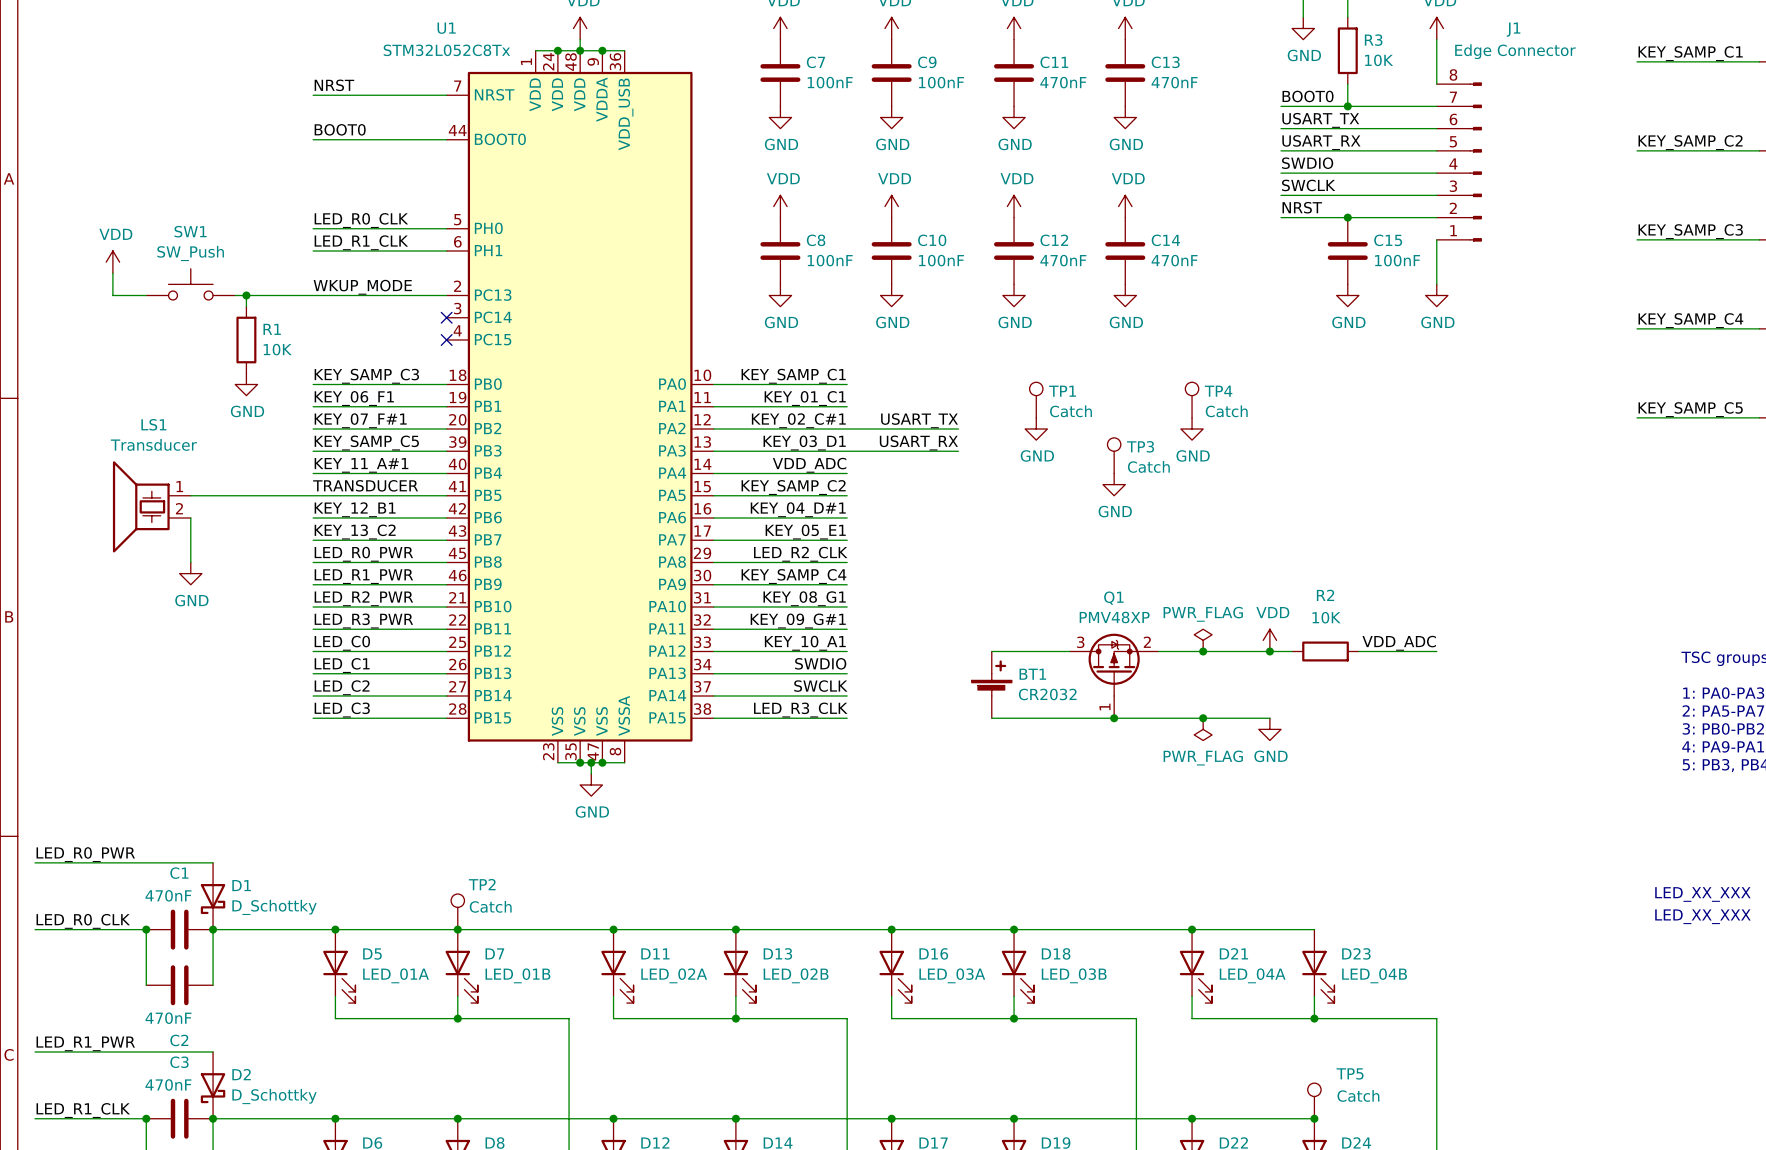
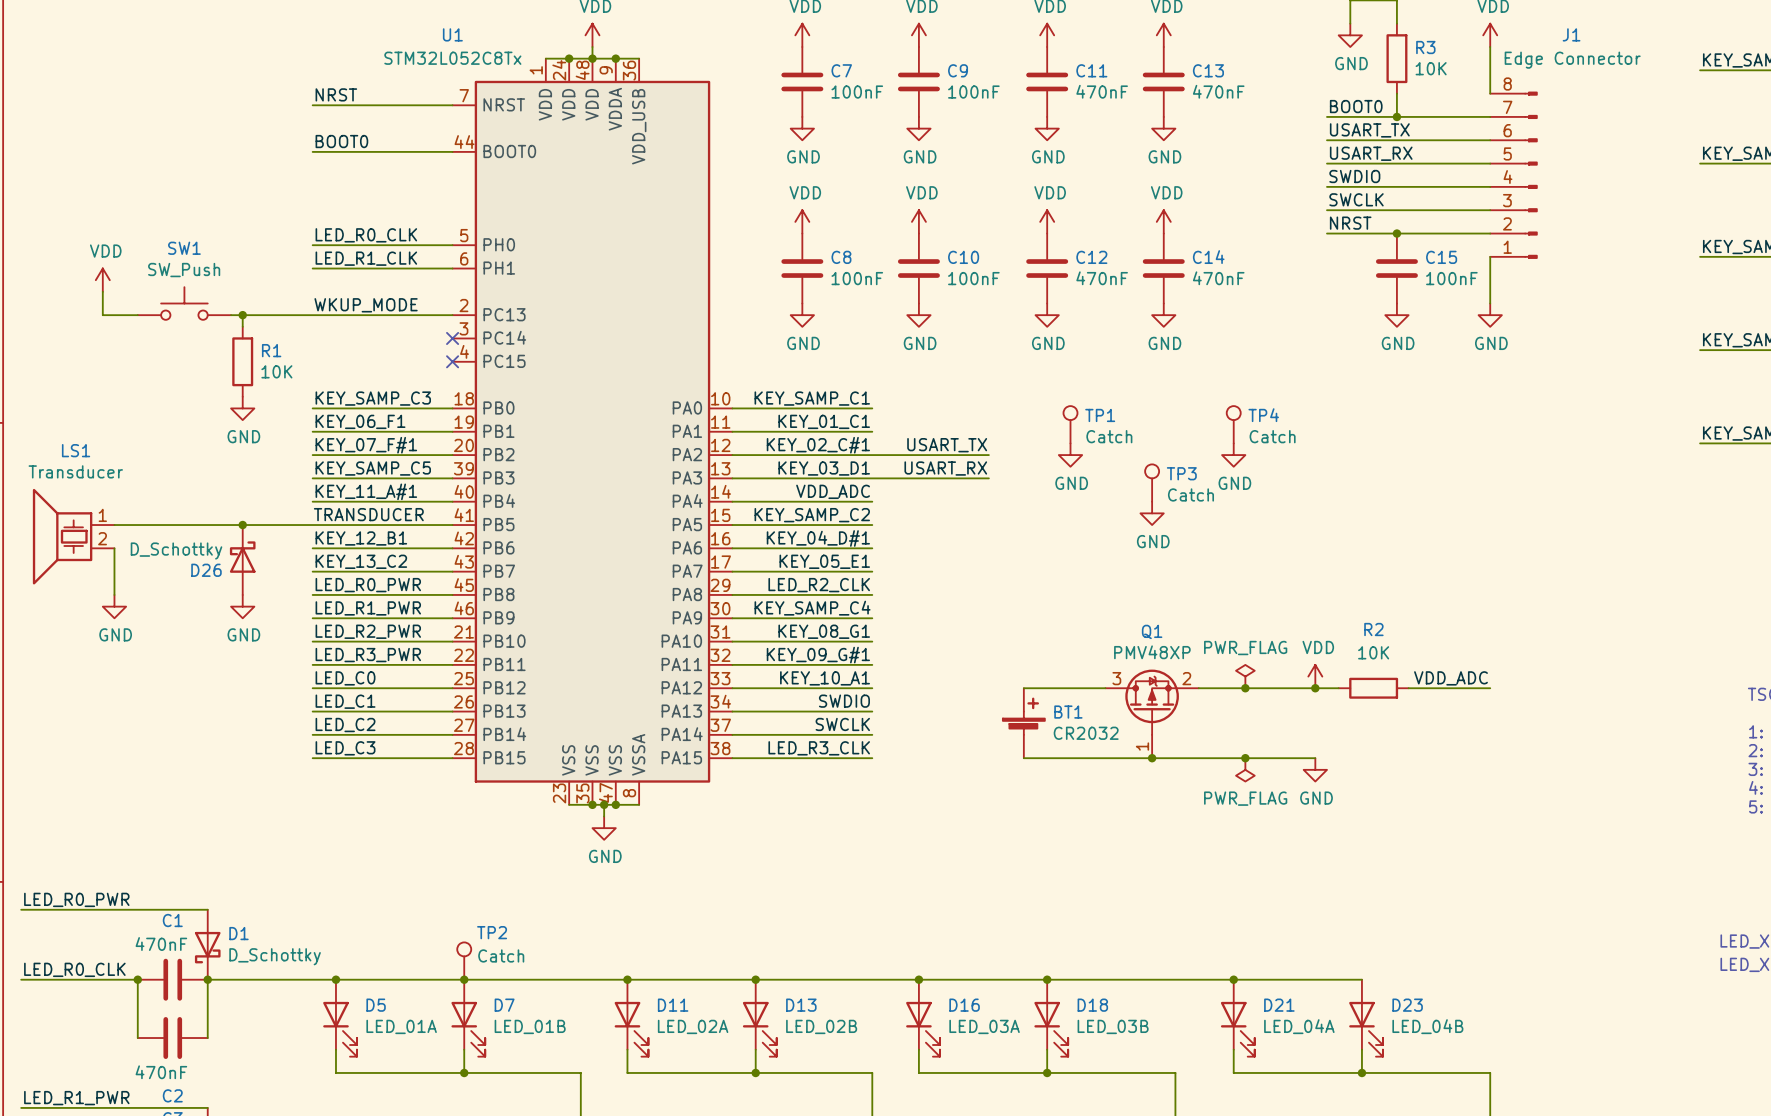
wire: none -> (114, 525) (184, 525)
junction: none -> (242, 525)
LS1 position: (151, 506) -> (73, 536)
wire: (190, 517) (190, 562) -> (114, 548) (114, 594)
D26: none -> D_Schottky (242, 559)
power symbol: none -> GND (114, 606)
power symbol: GND (190, 573) -> none
power symbol: none -> GND (242, 606)

